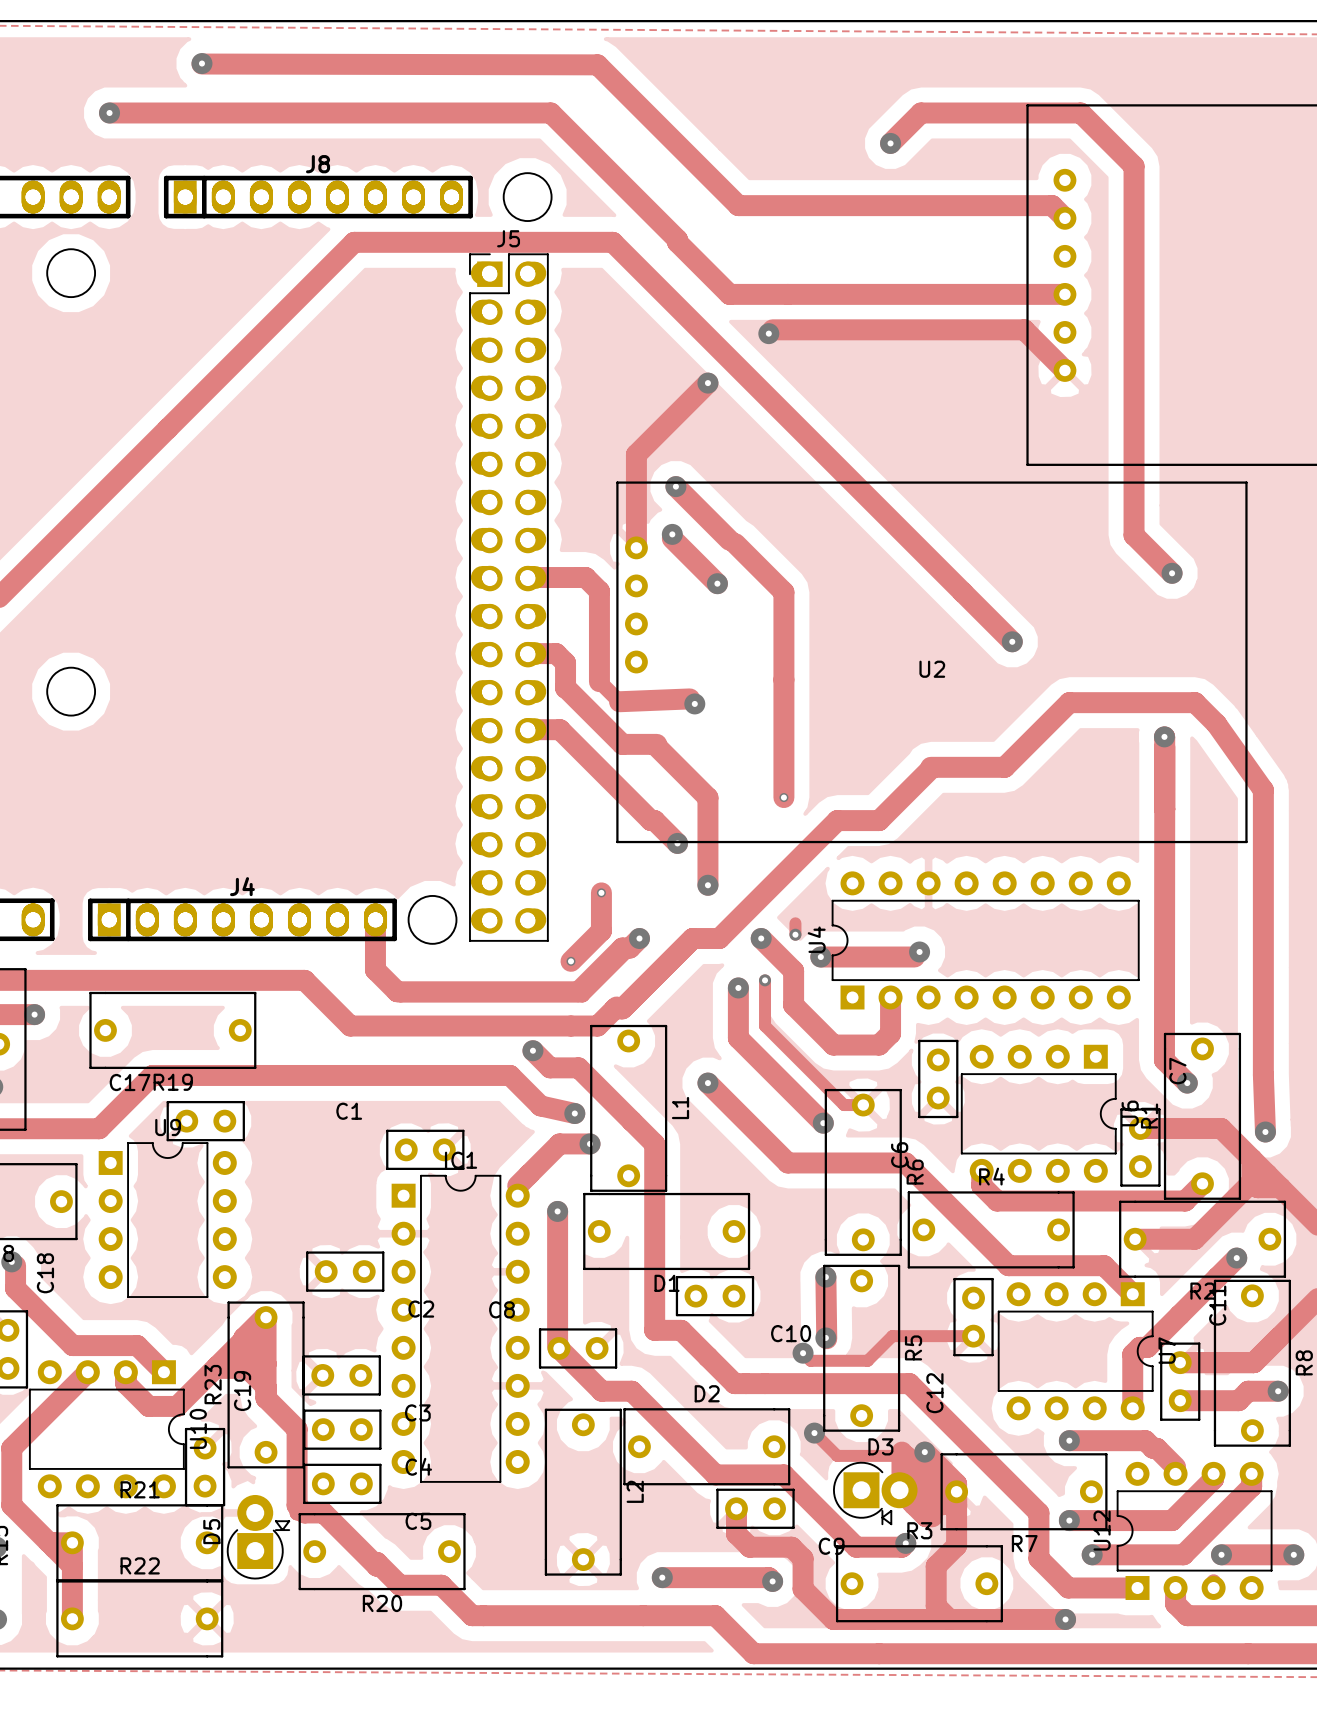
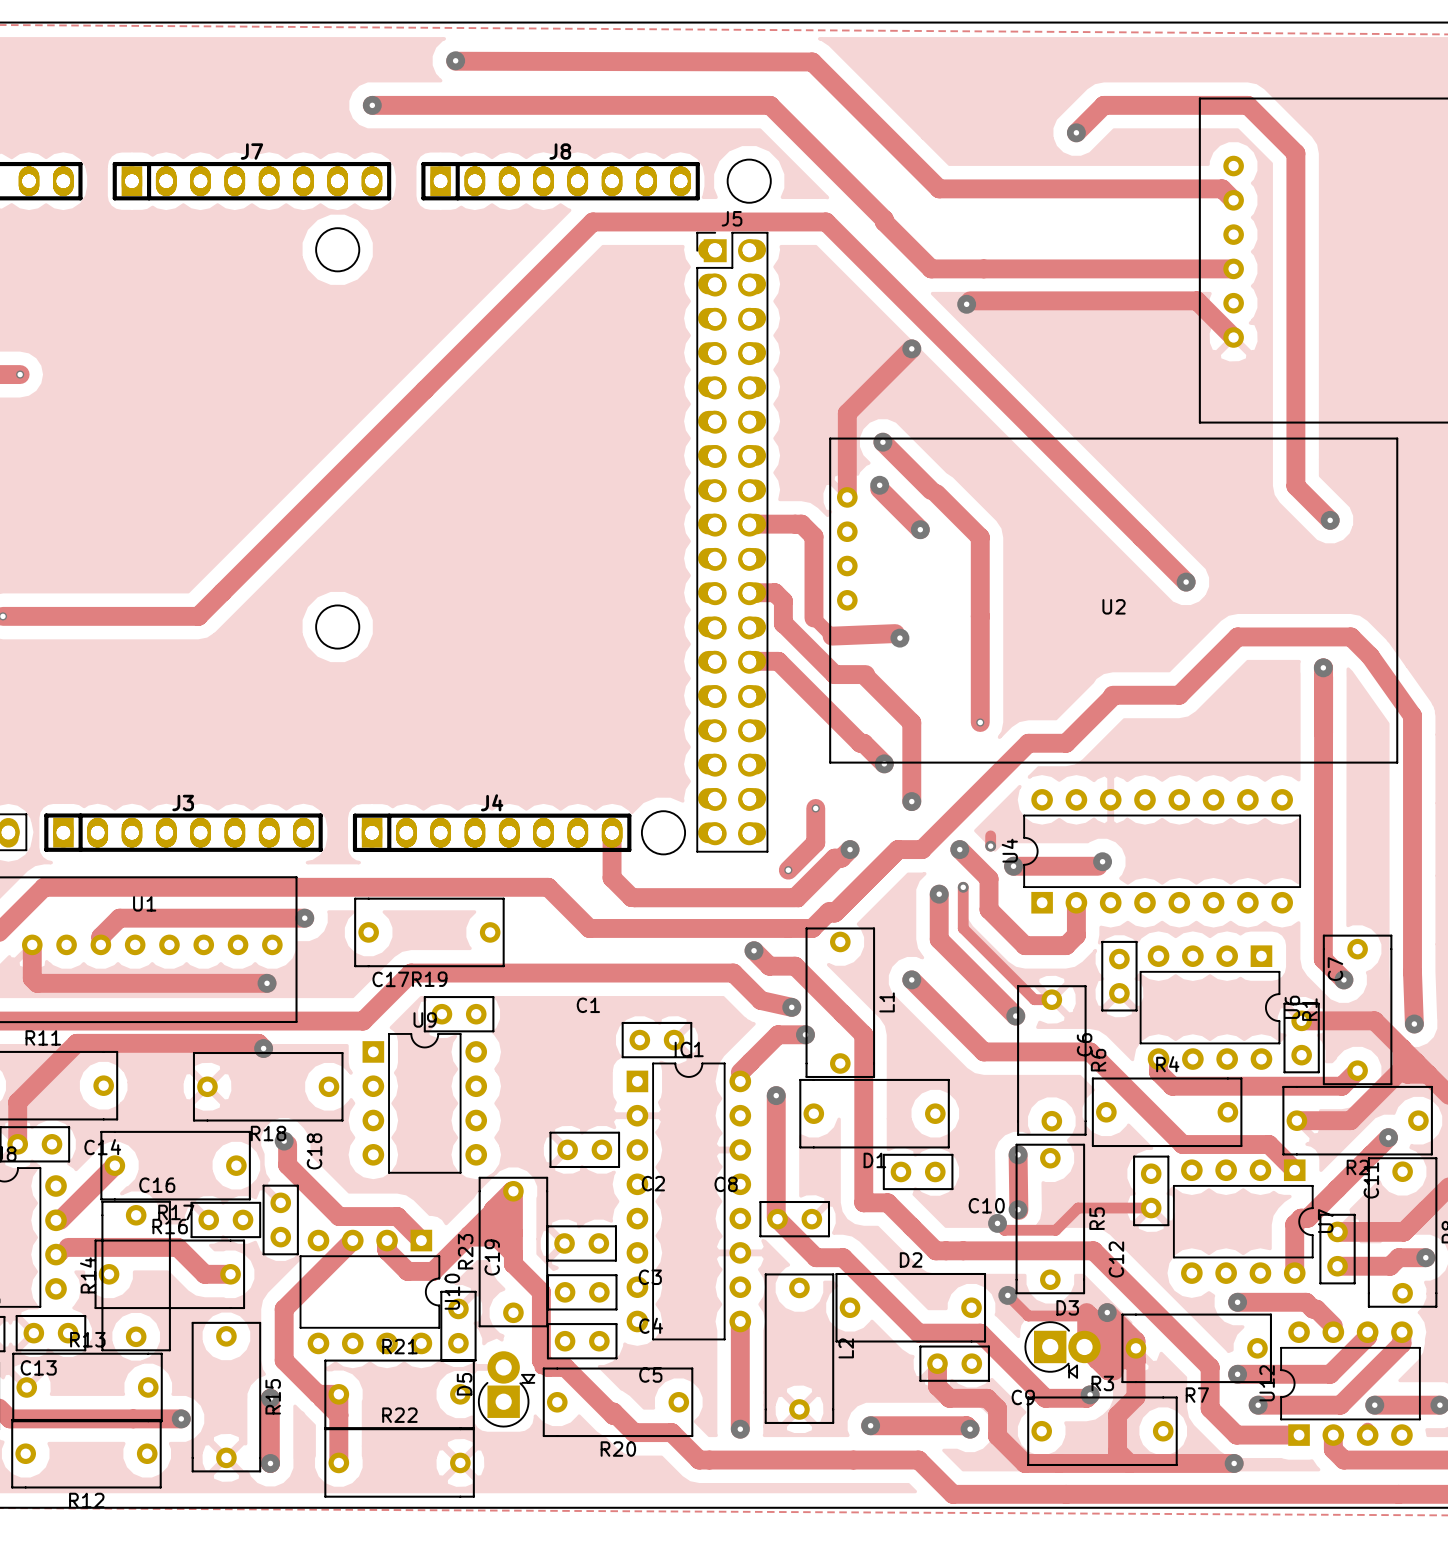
track: none -> (740, 1321) (740, 1429)
via: none -> (740, 1429)

